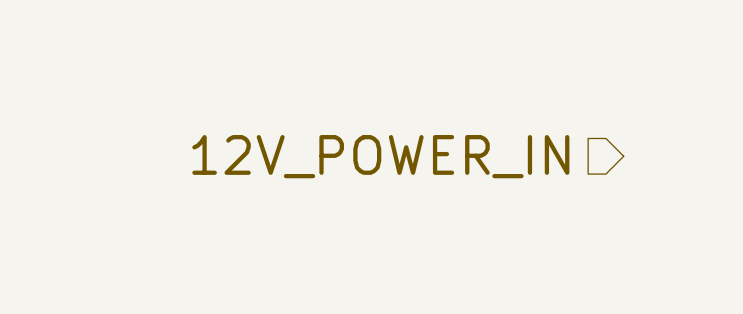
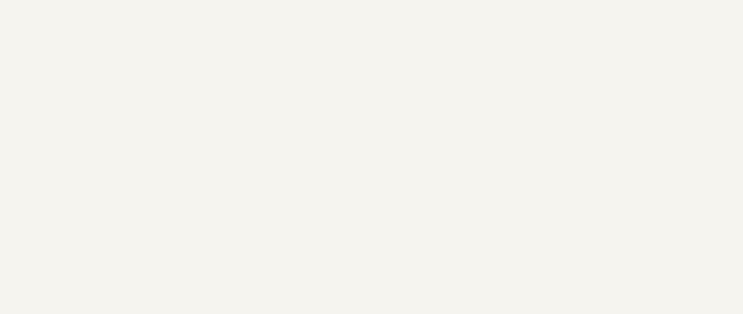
hierarchical label: 12V_POWER_IN (380, 156) -> none

